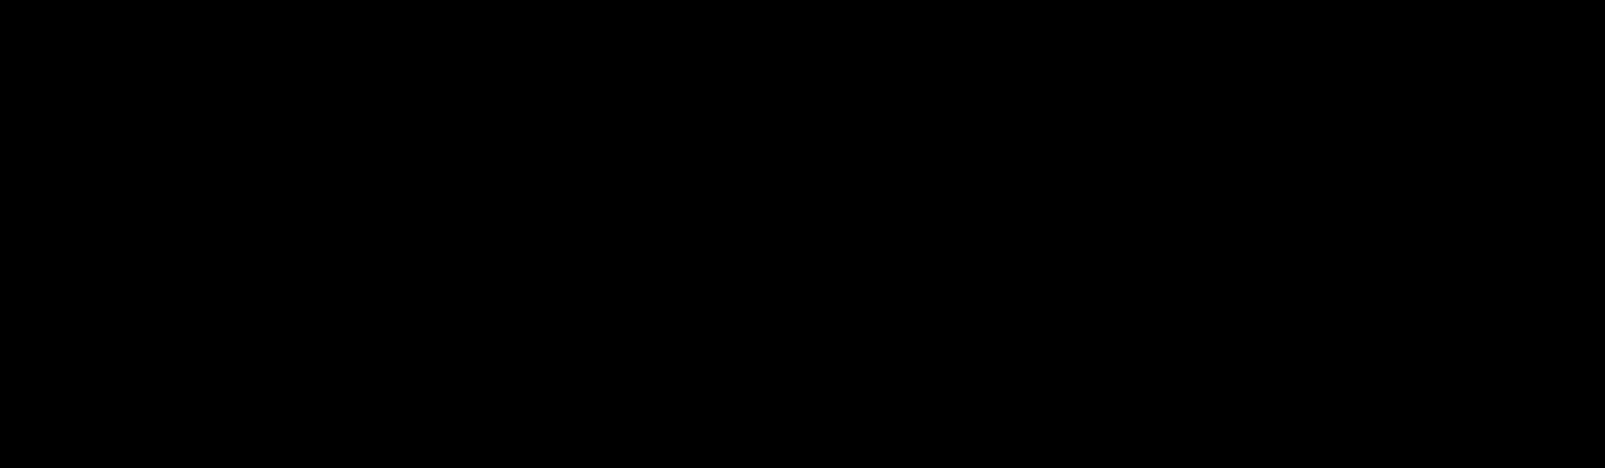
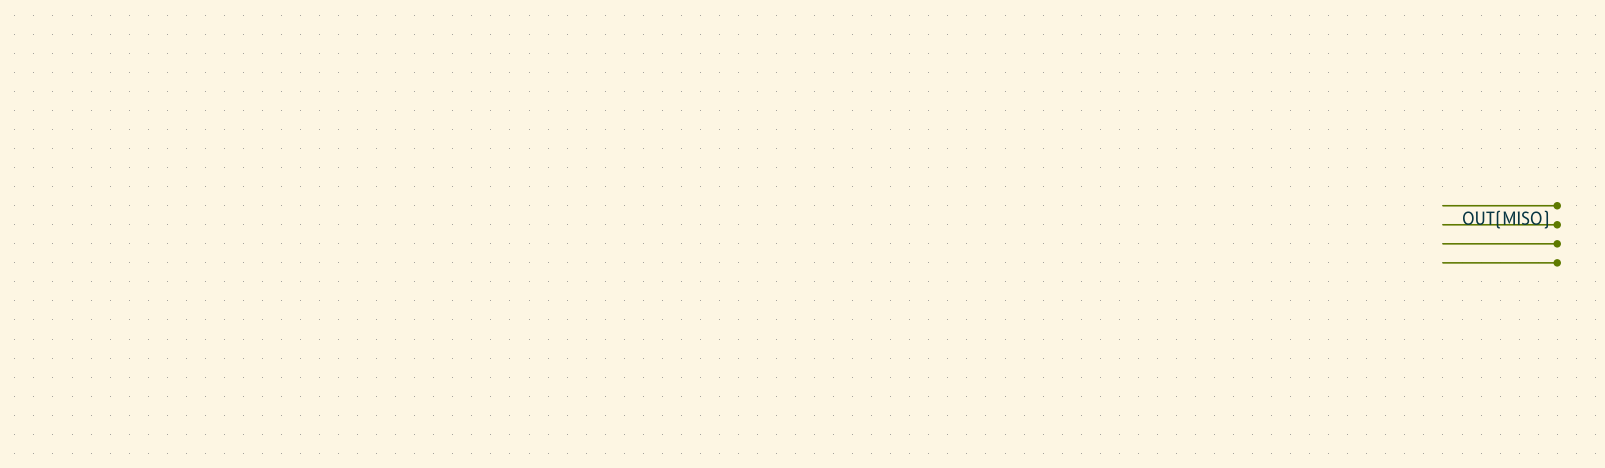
wire: none -> (1442, 205) (1557, 205)
junction: none -> (1557, 205)
label: none -> OUT(MISO) (1505, 219)
wire: none -> (1442, 224) (1557, 224)
junction: none -> (1557, 224)
wire: none -> (1442, 243) (1557, 243)
junction: none -> (1557, 243)
wire: none -> (1442, 262) (1557, 262)
junction: none -> (1557, 262)

